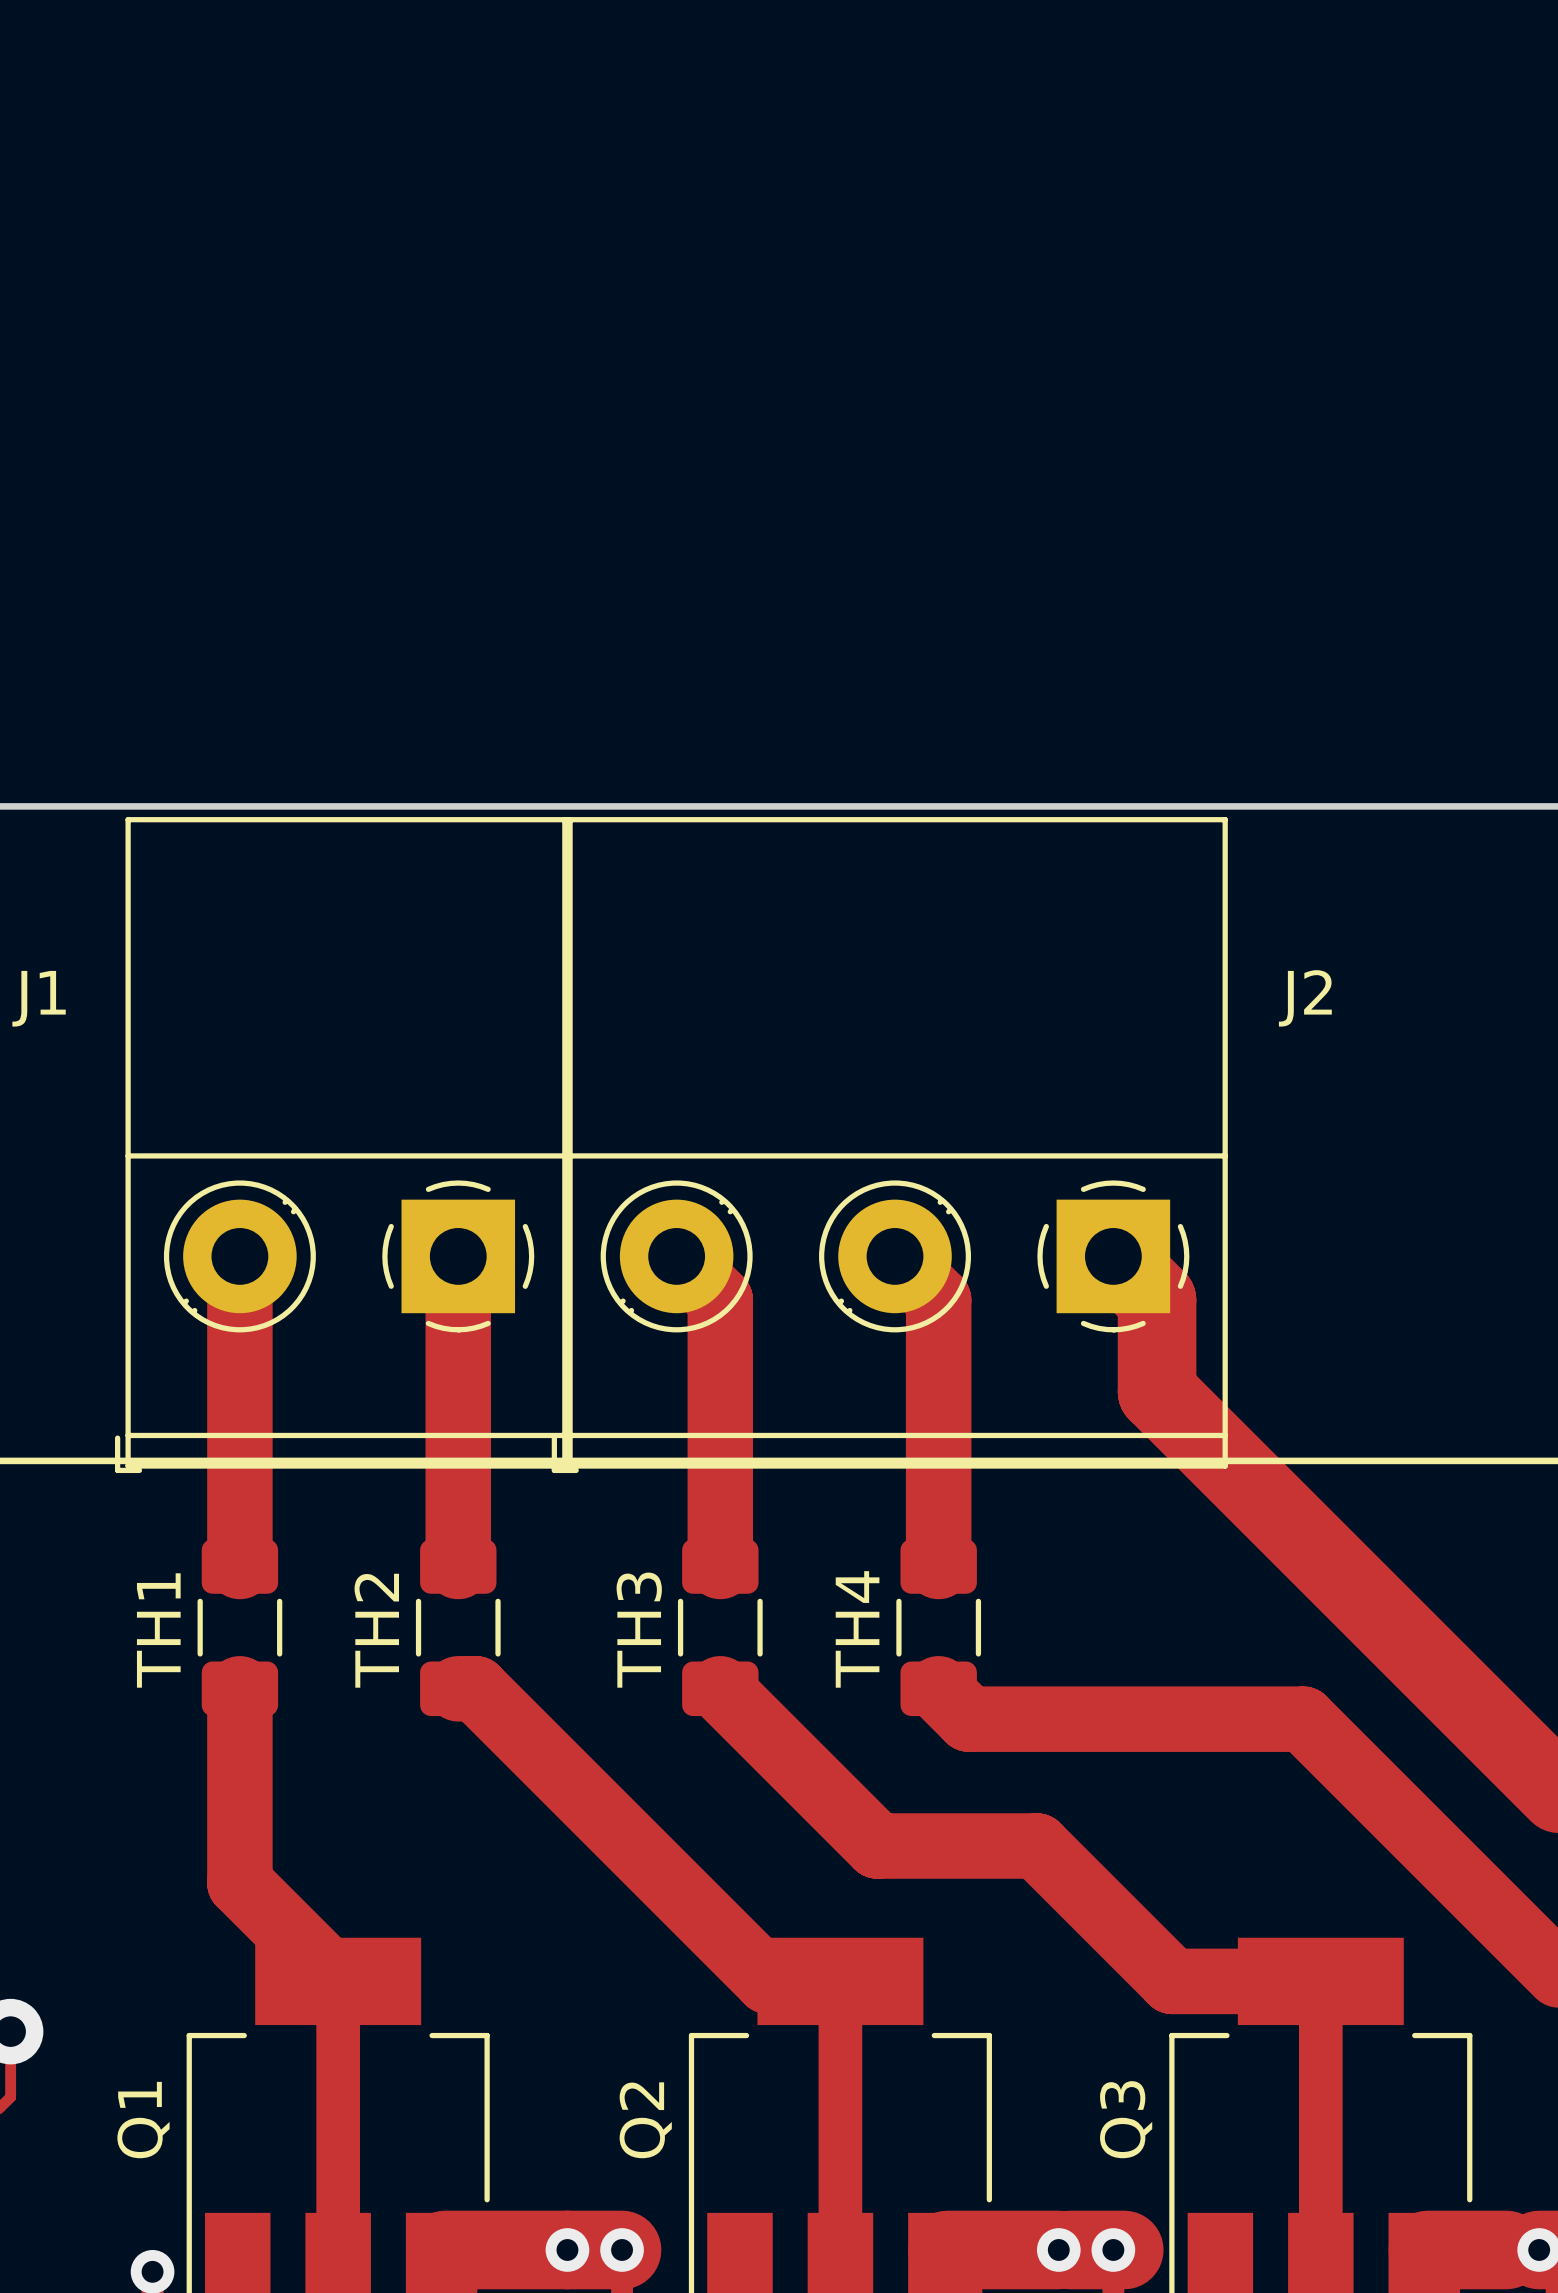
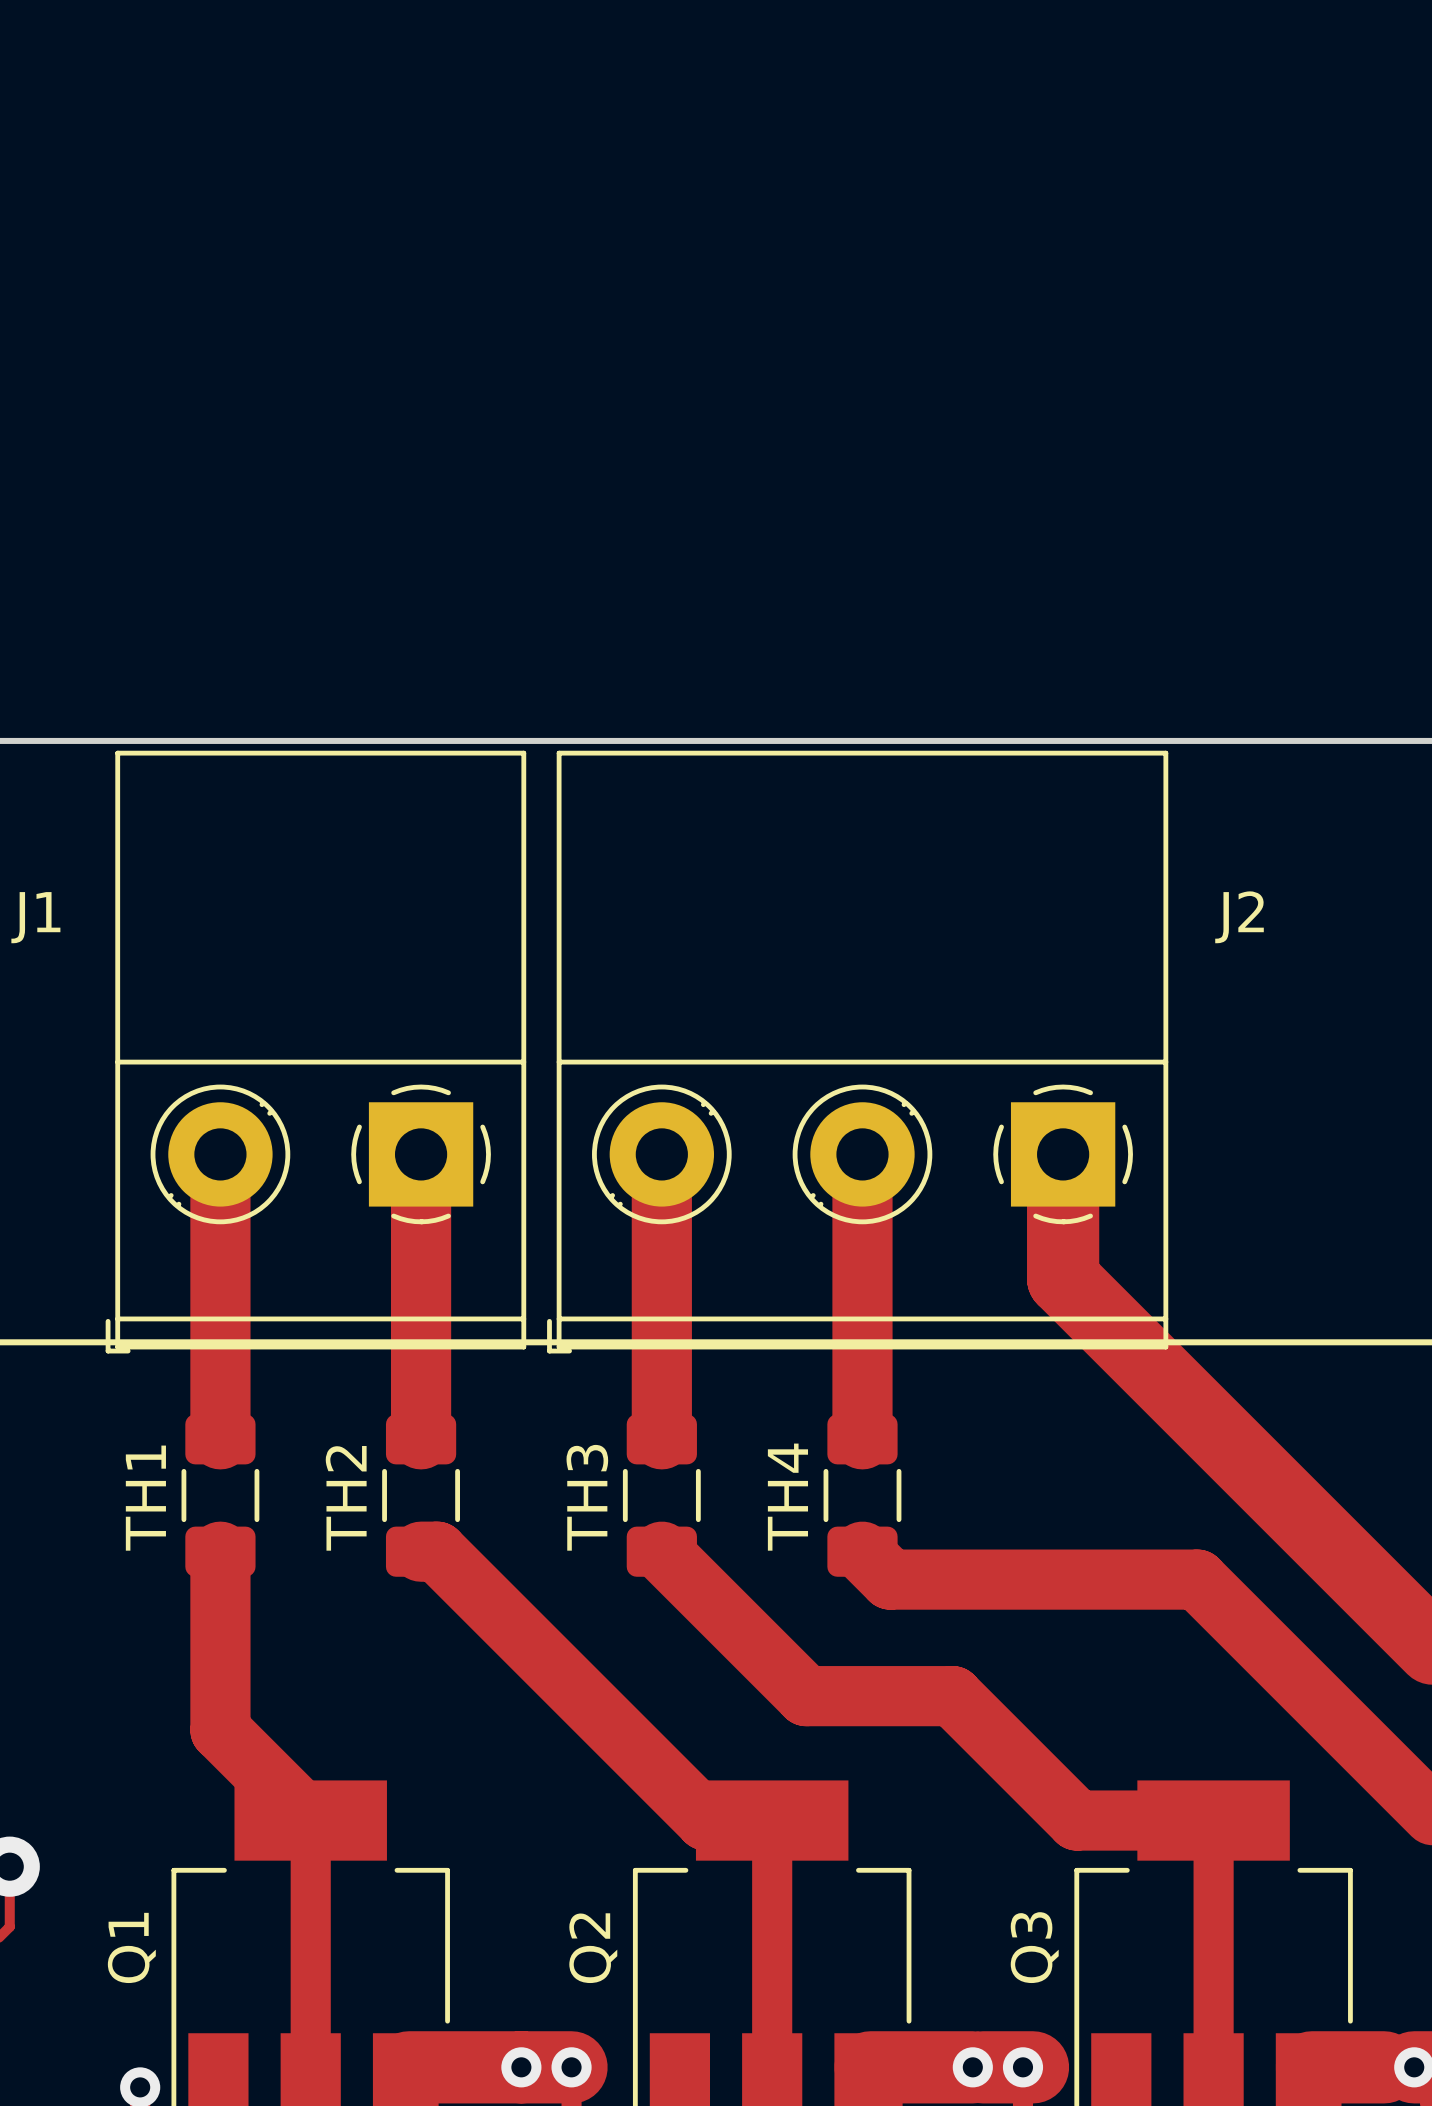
J2 position: (889, 1145) -> (857, 1052)

